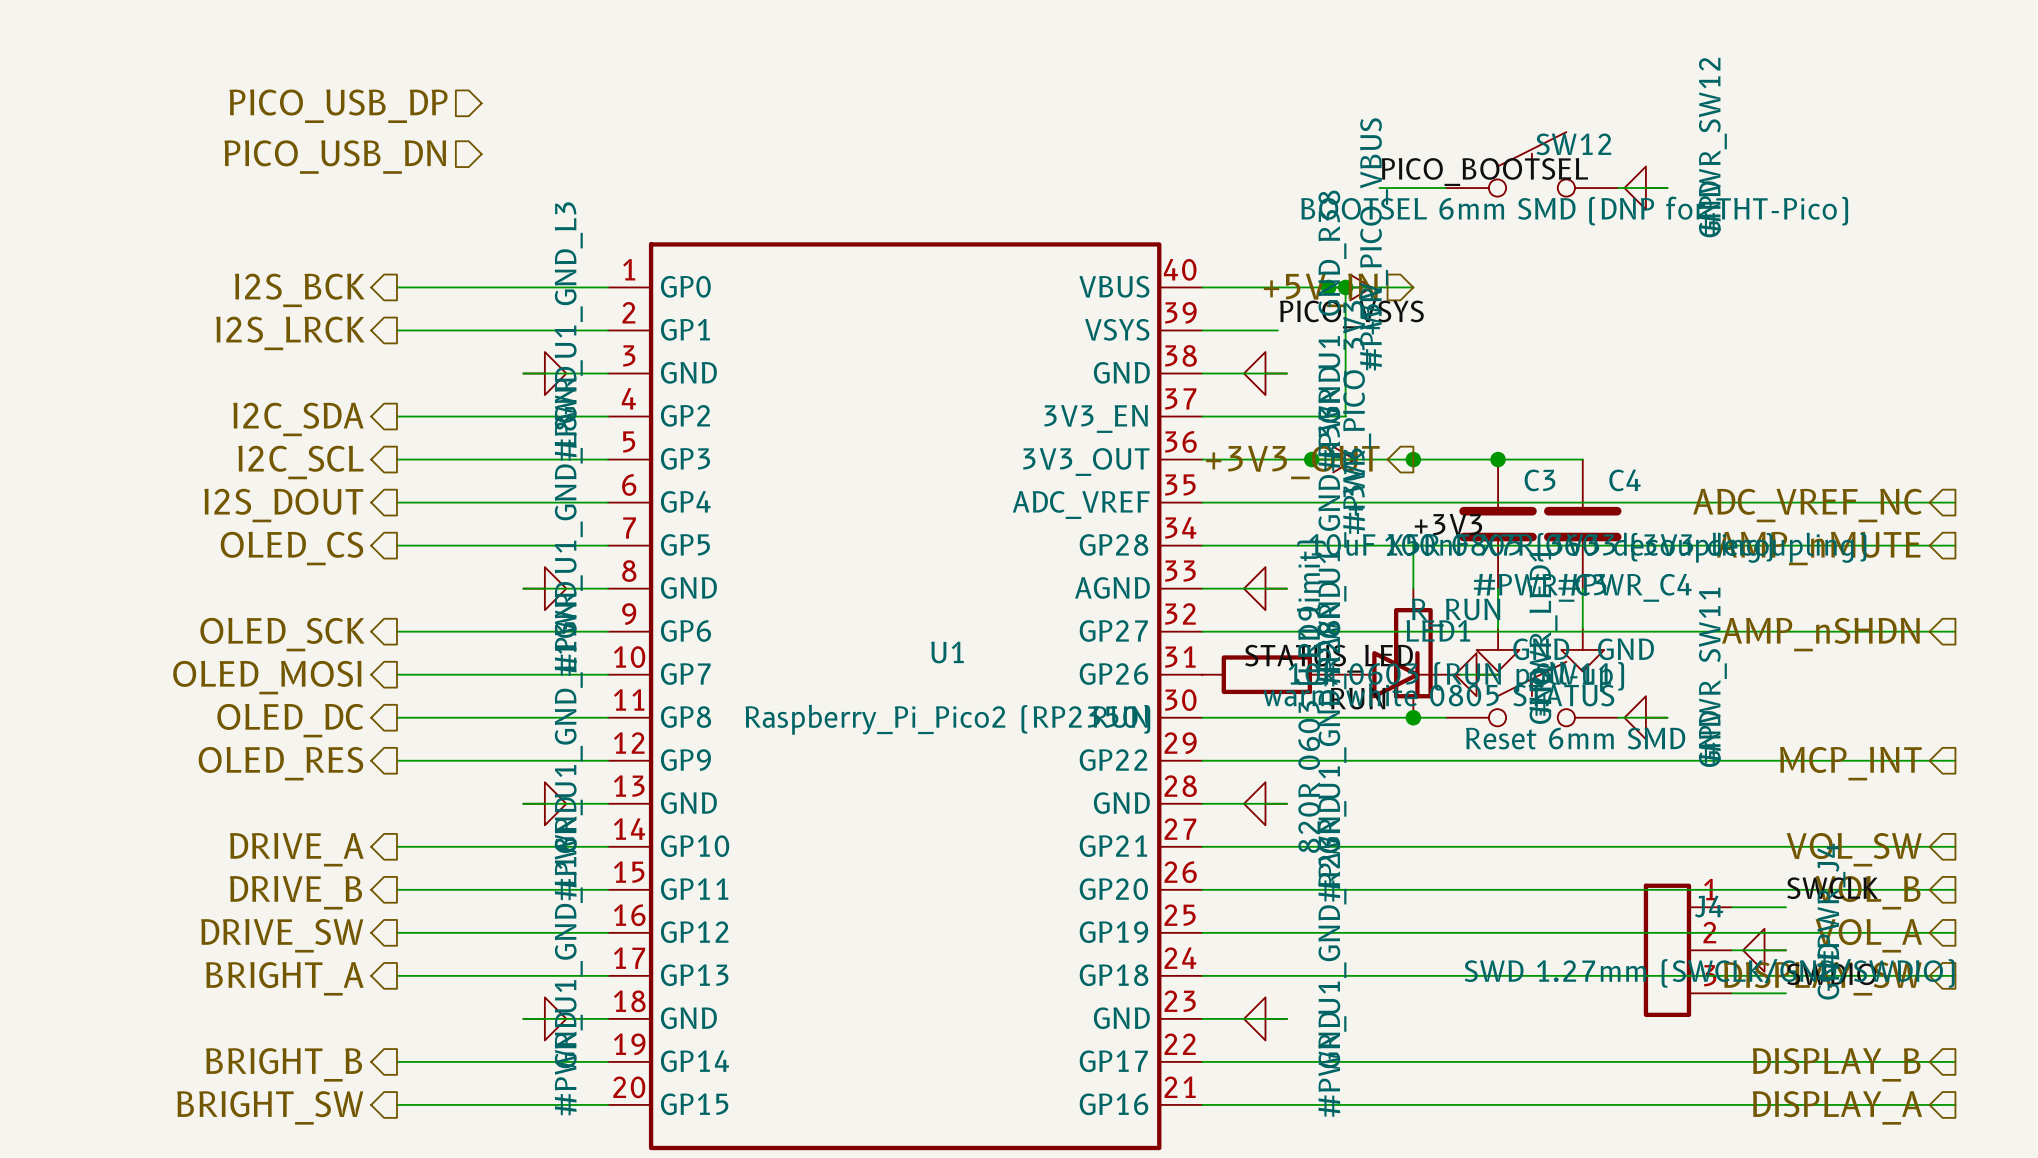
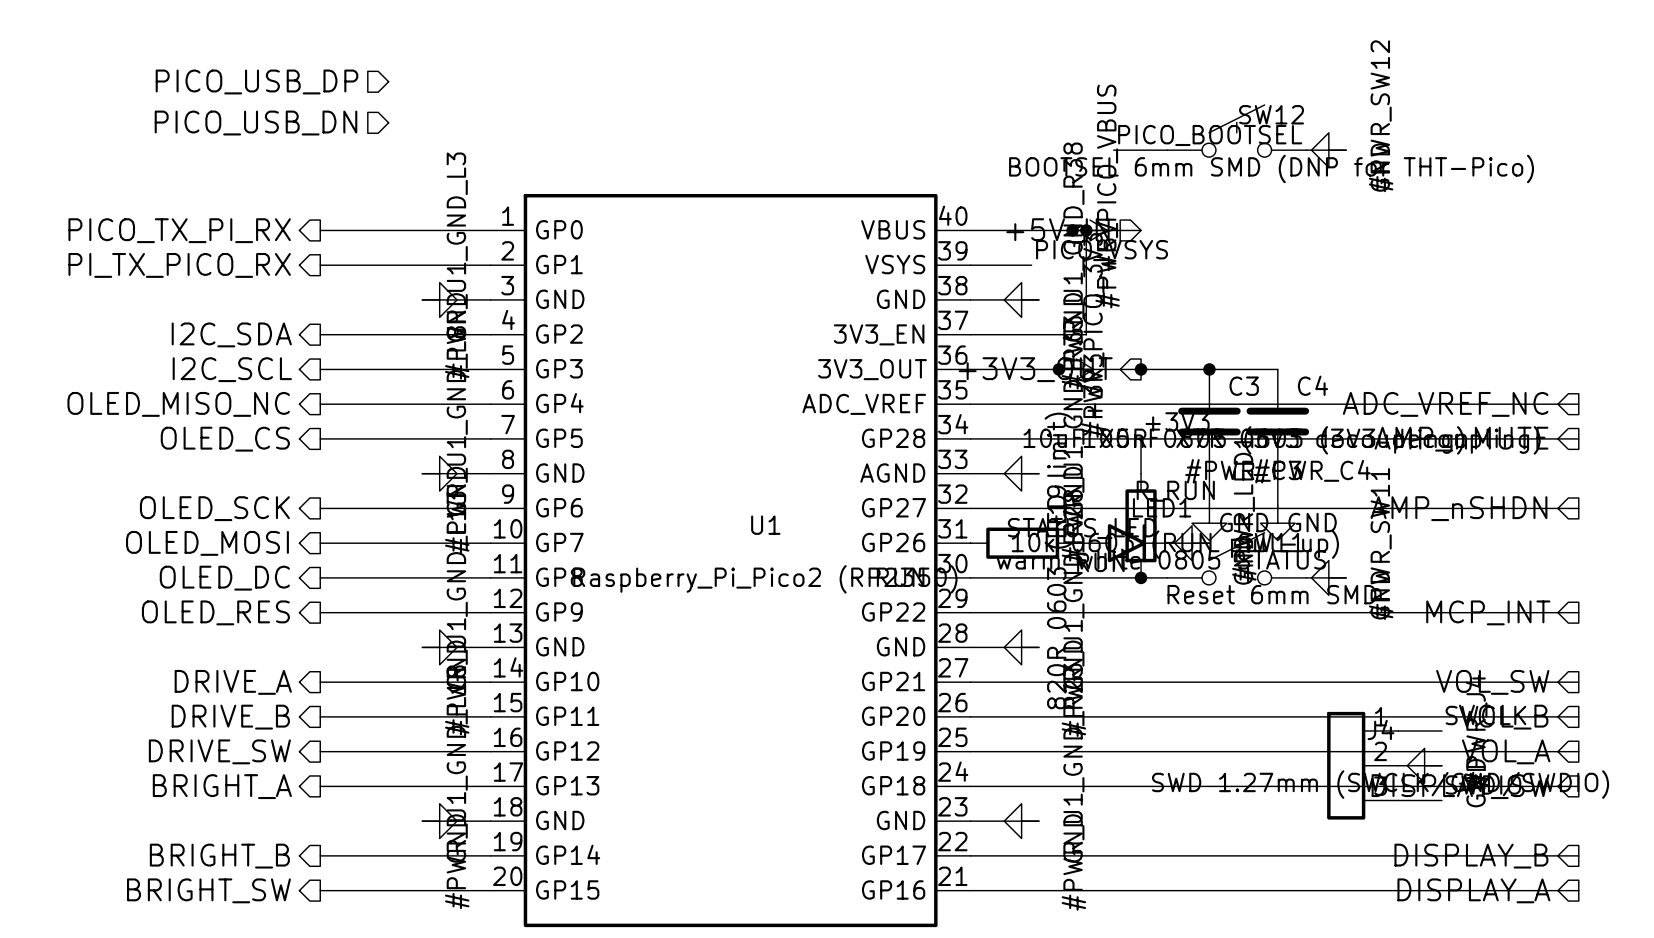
hierarchical label: I2S_BCK (299, 290) -> PICO_TX_PI_RX (179, 230)
hierarchical label: I2S_LRCK (290, 333) -> PI_TX_PICO_RX (179, 265)
hierarchical label: I2S_DOUT (283, 505) -> OLED_MISO_NC (178, 404)

